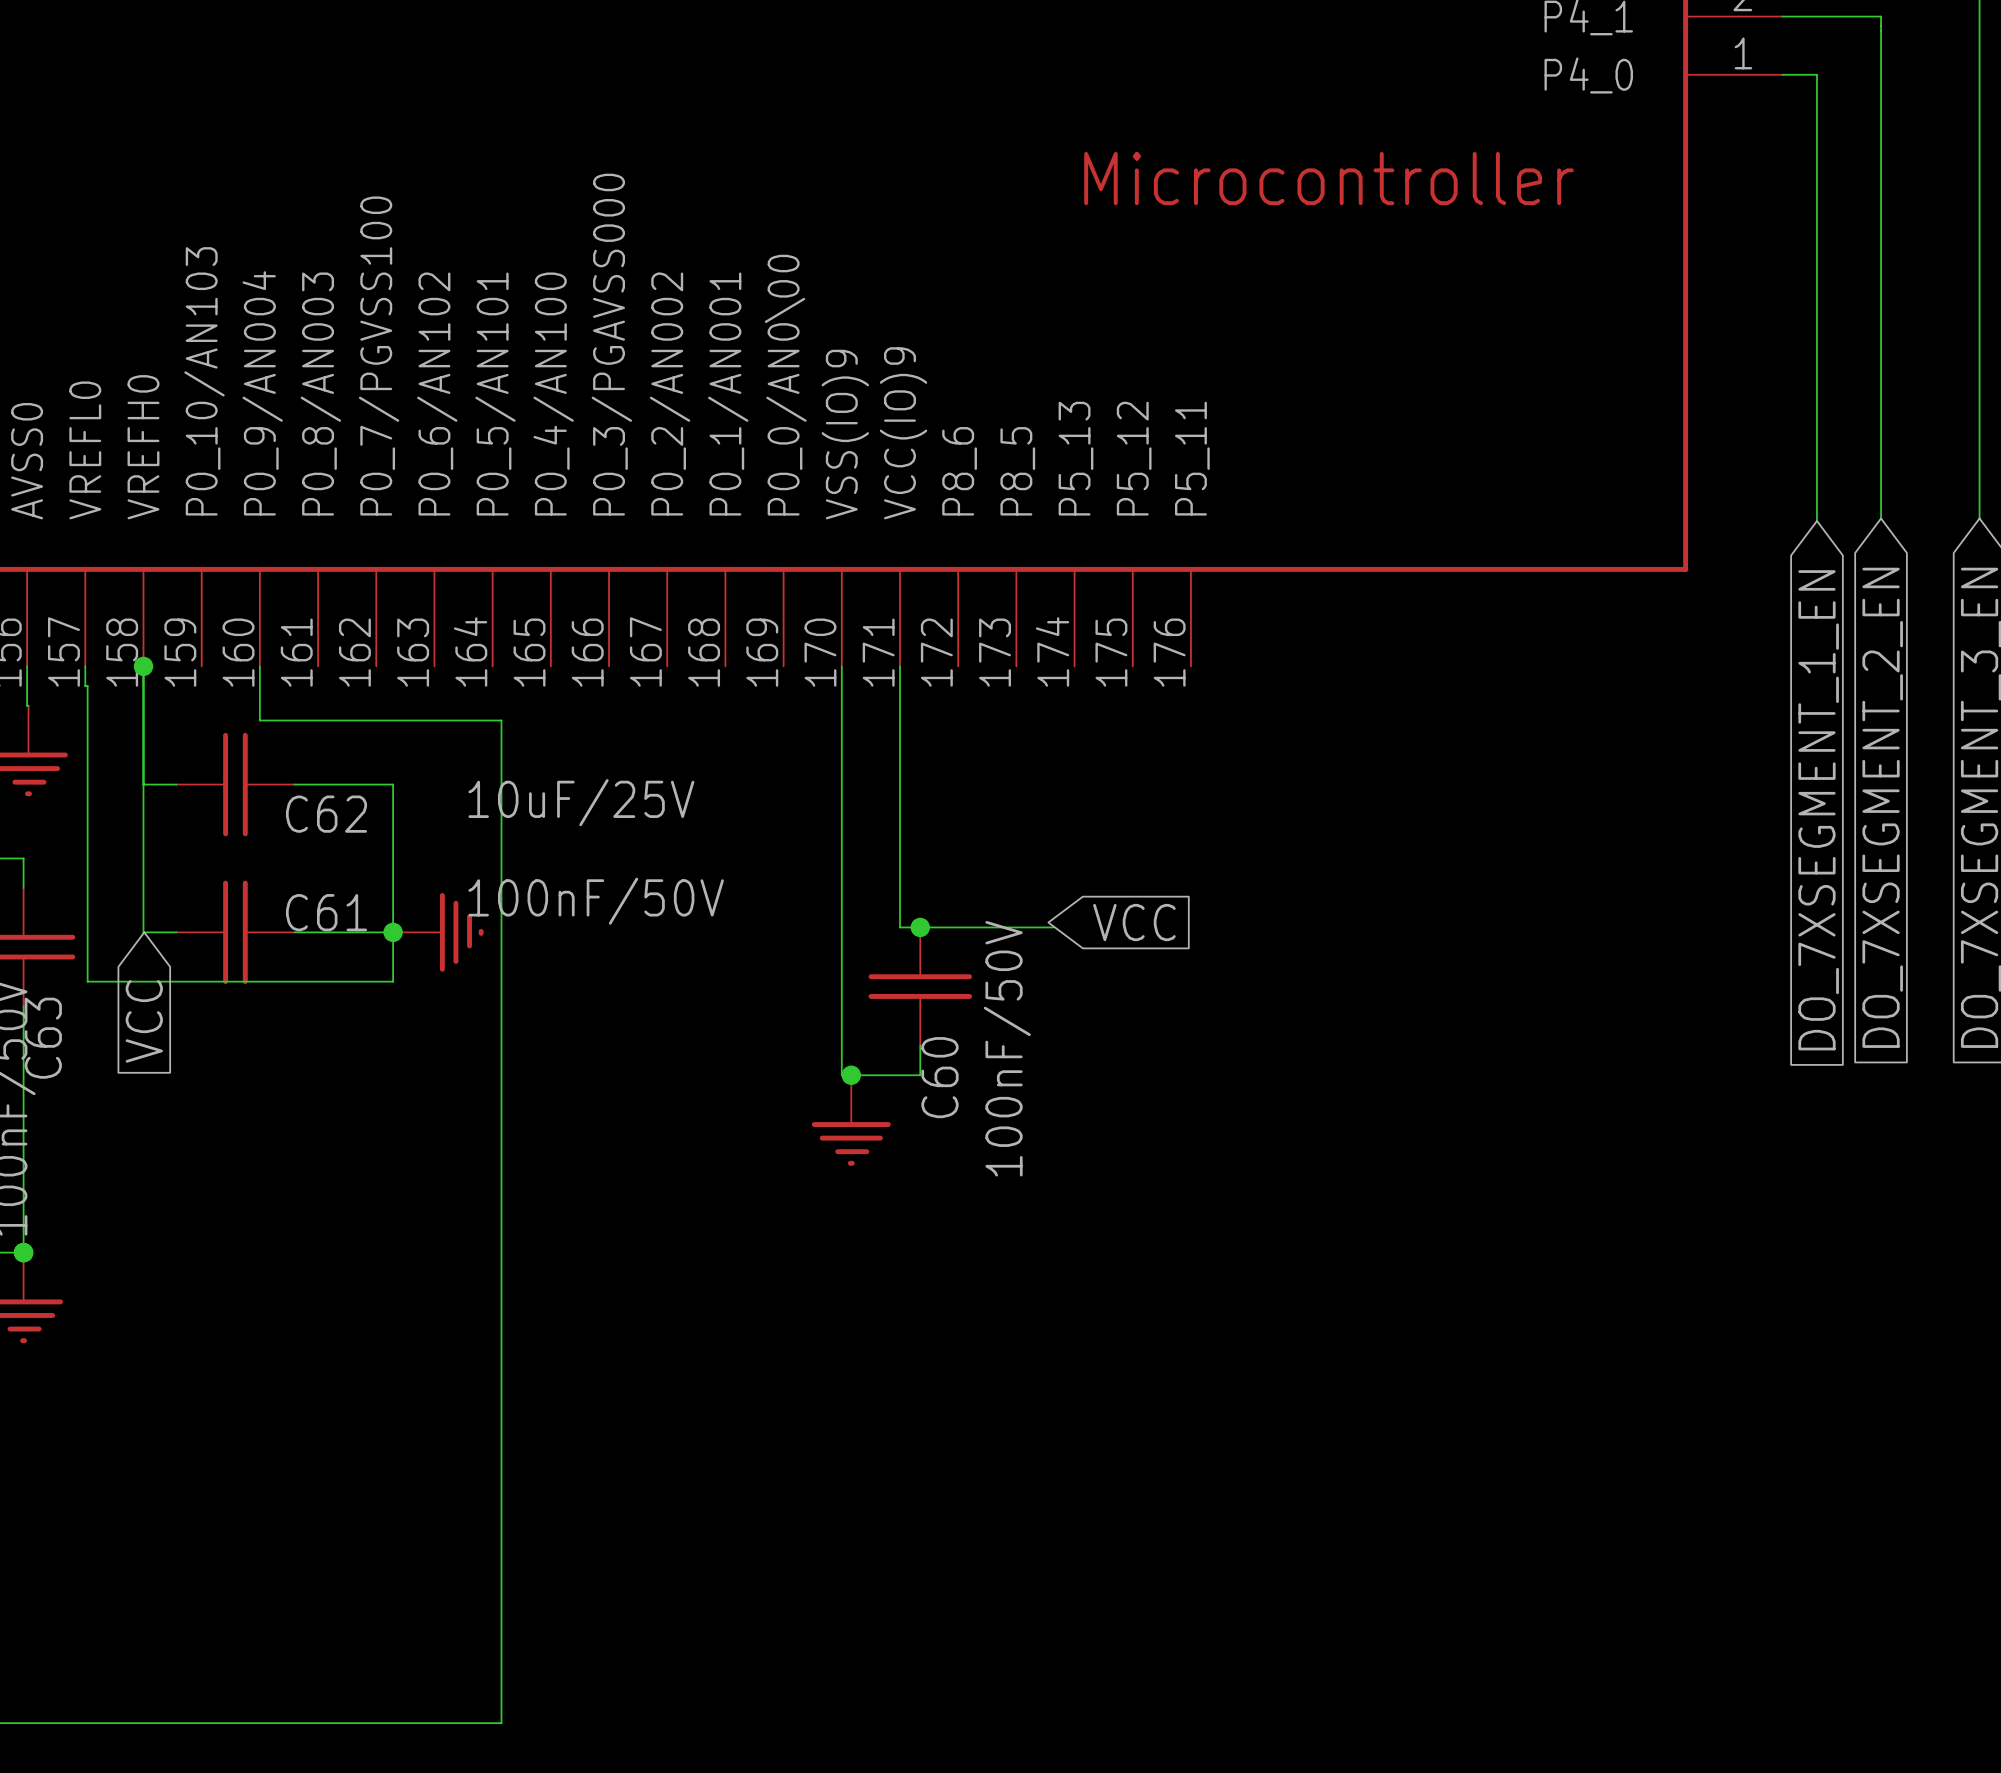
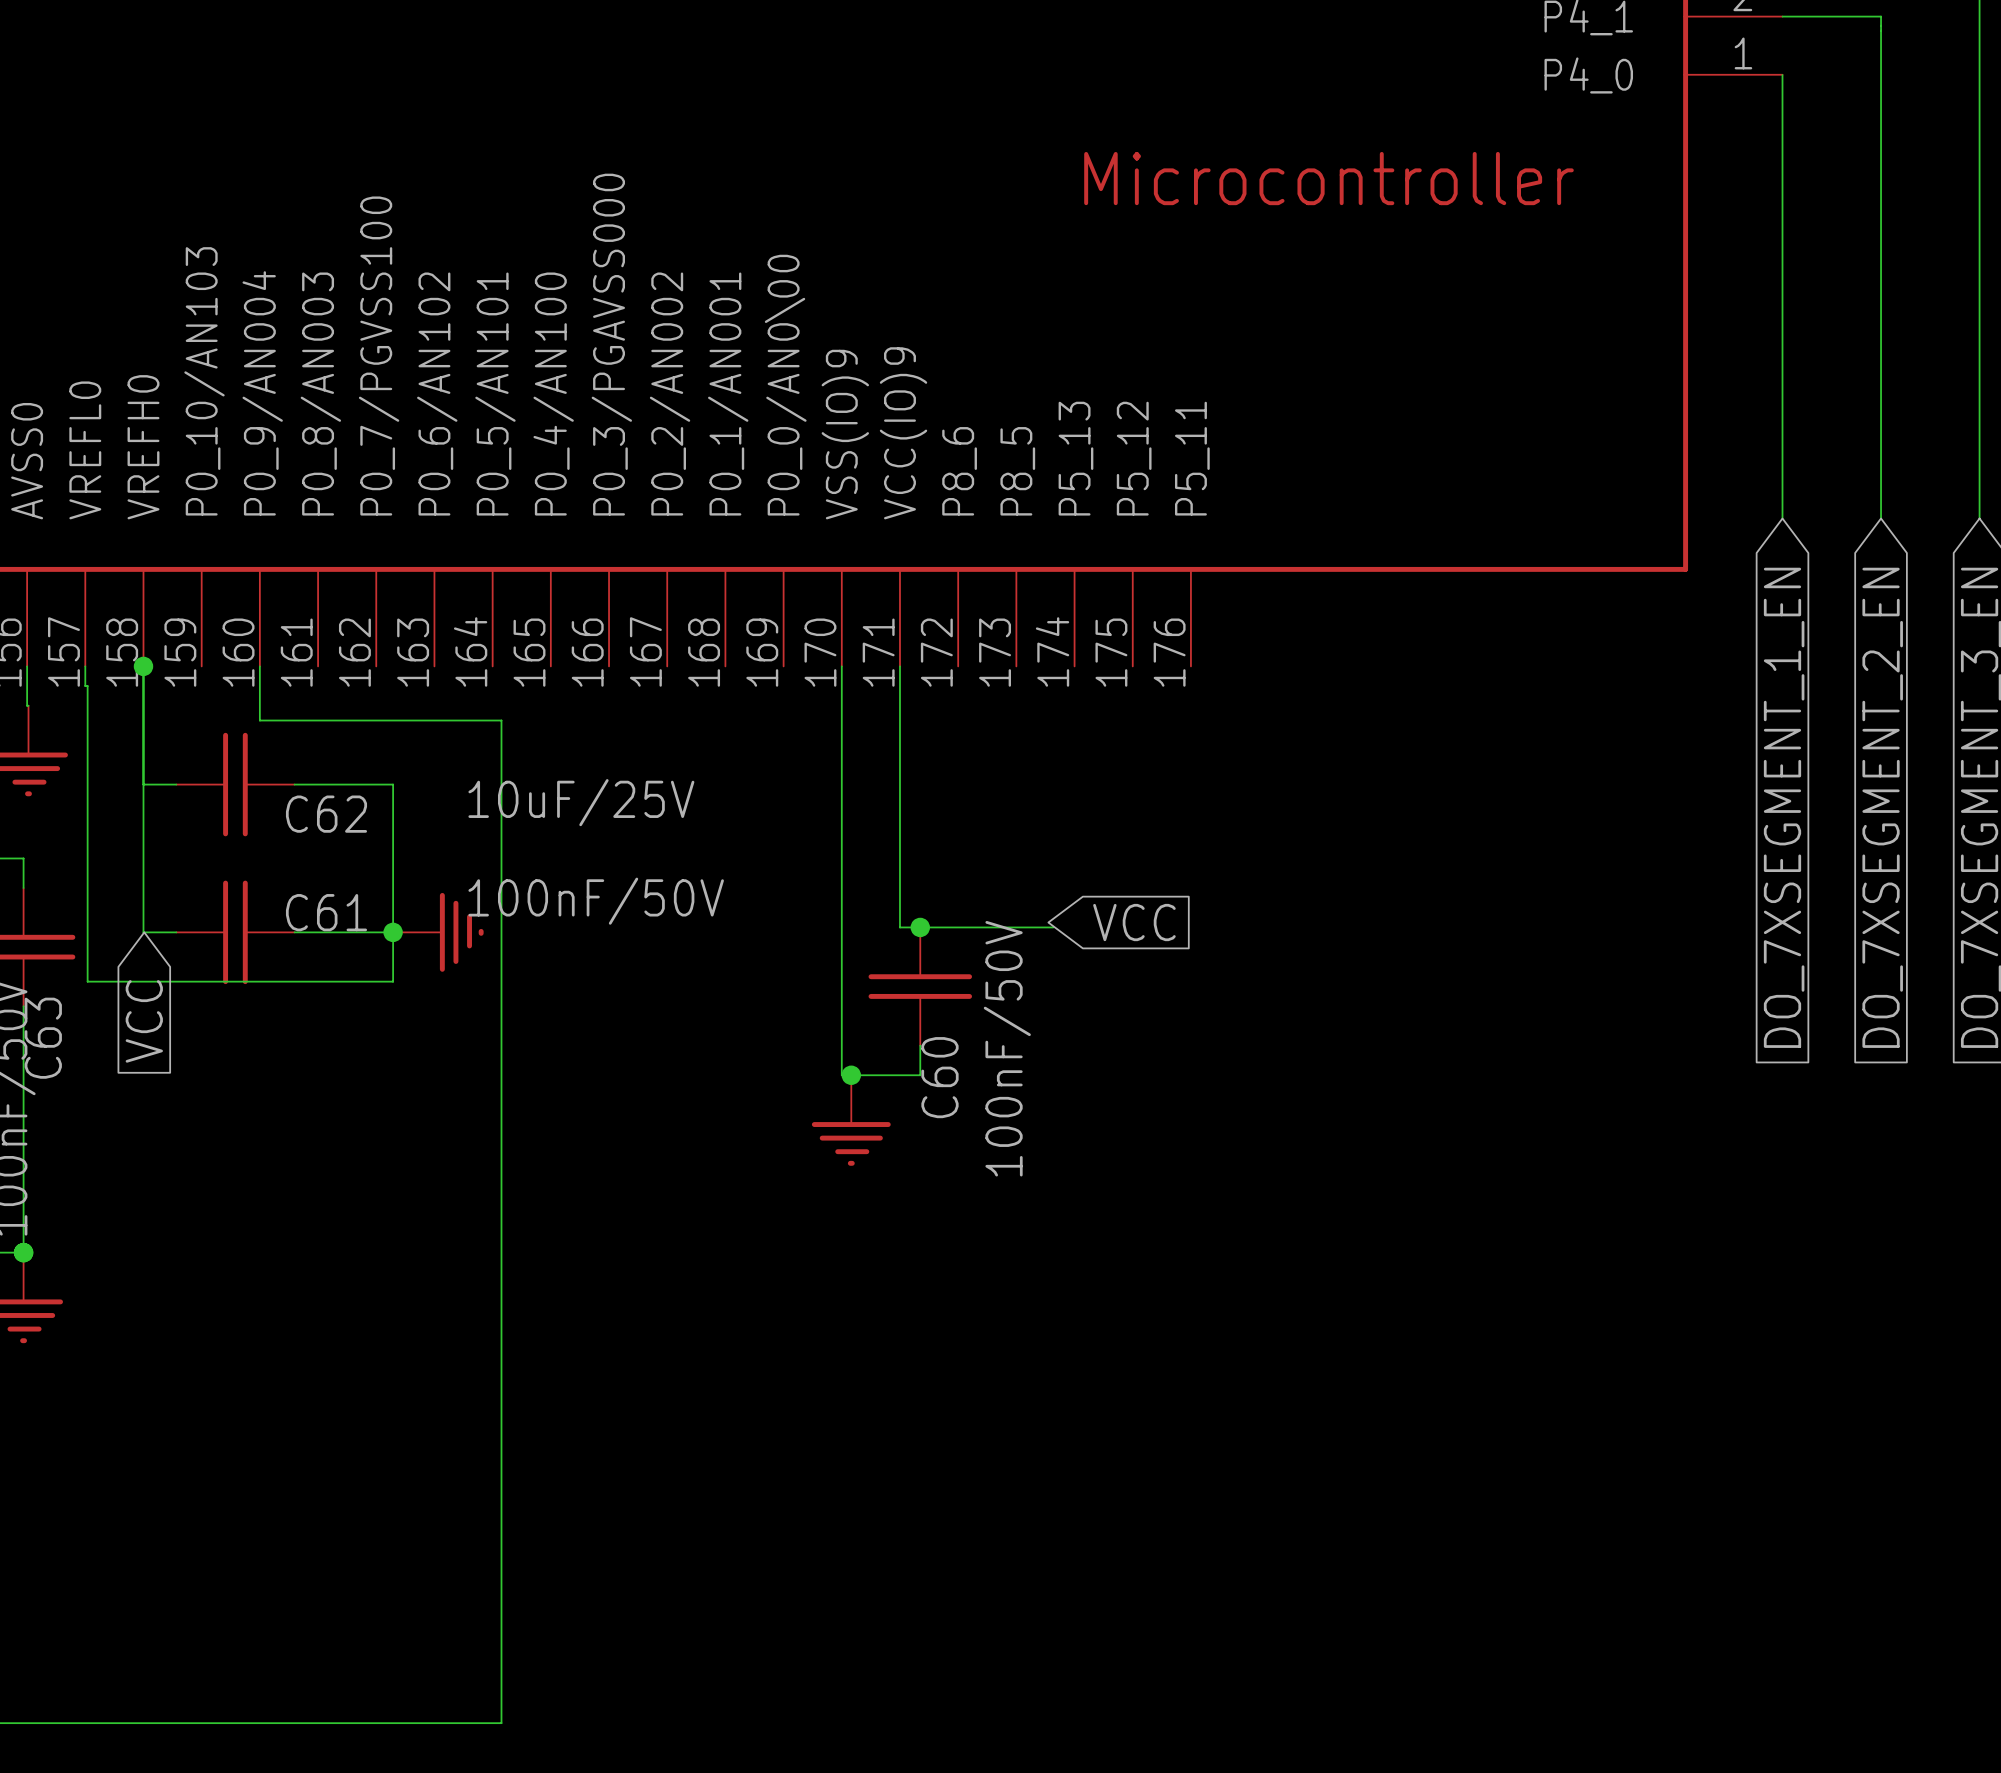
wire: (1782, 74) (1816, 74) (1816, 520) -> (1782, 75) (1782, 518)
global label position: DO_7XSEGMENT_1_EN (1818, 810) -> DO_7XSEGMENT_1_EN (1784, 807)

